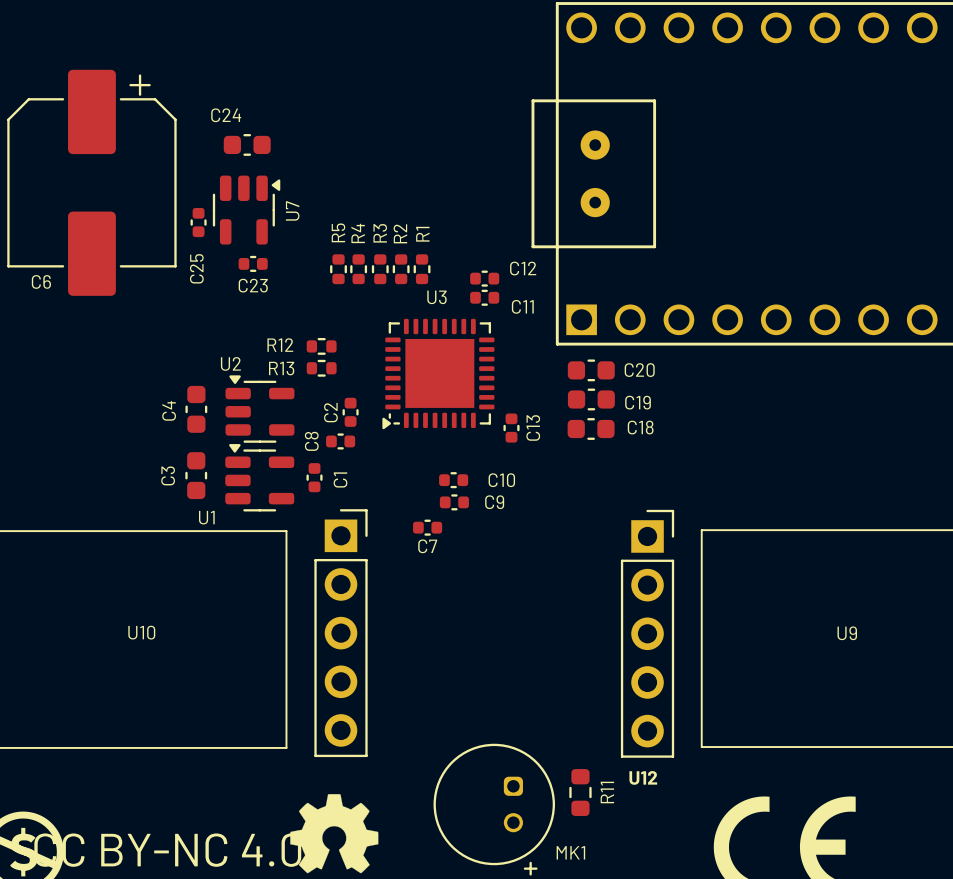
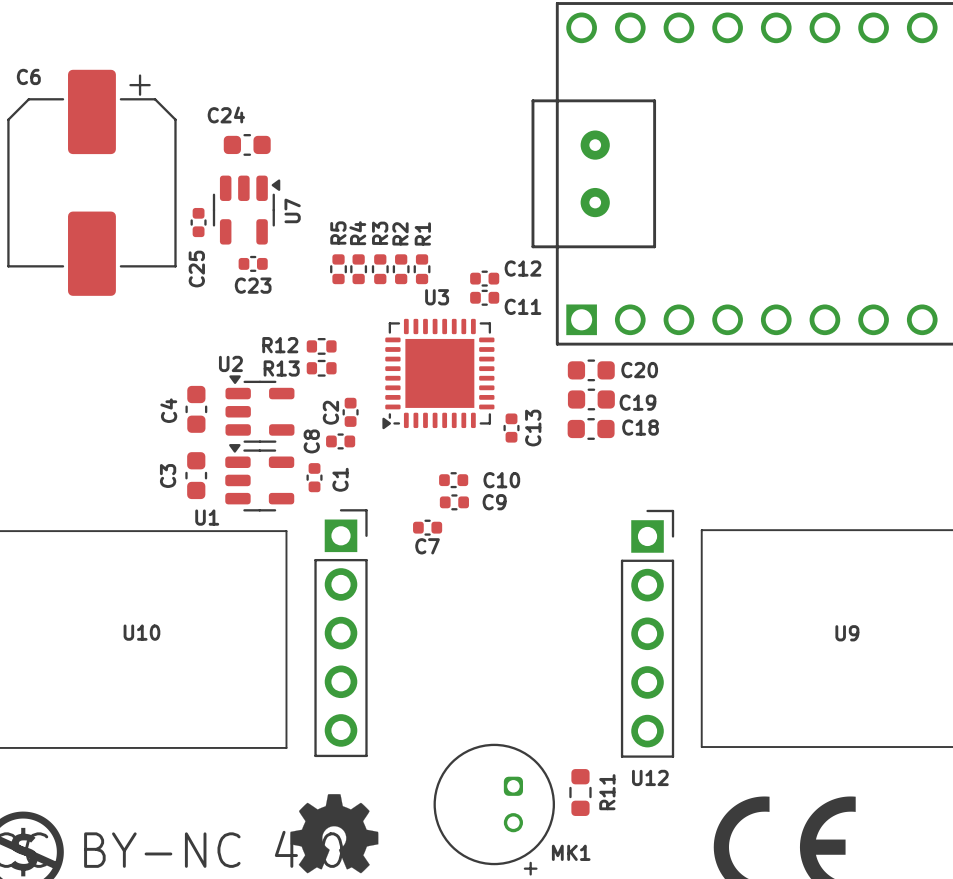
C6 name position: C6 (41, 281) -> C6 (28, 76)

